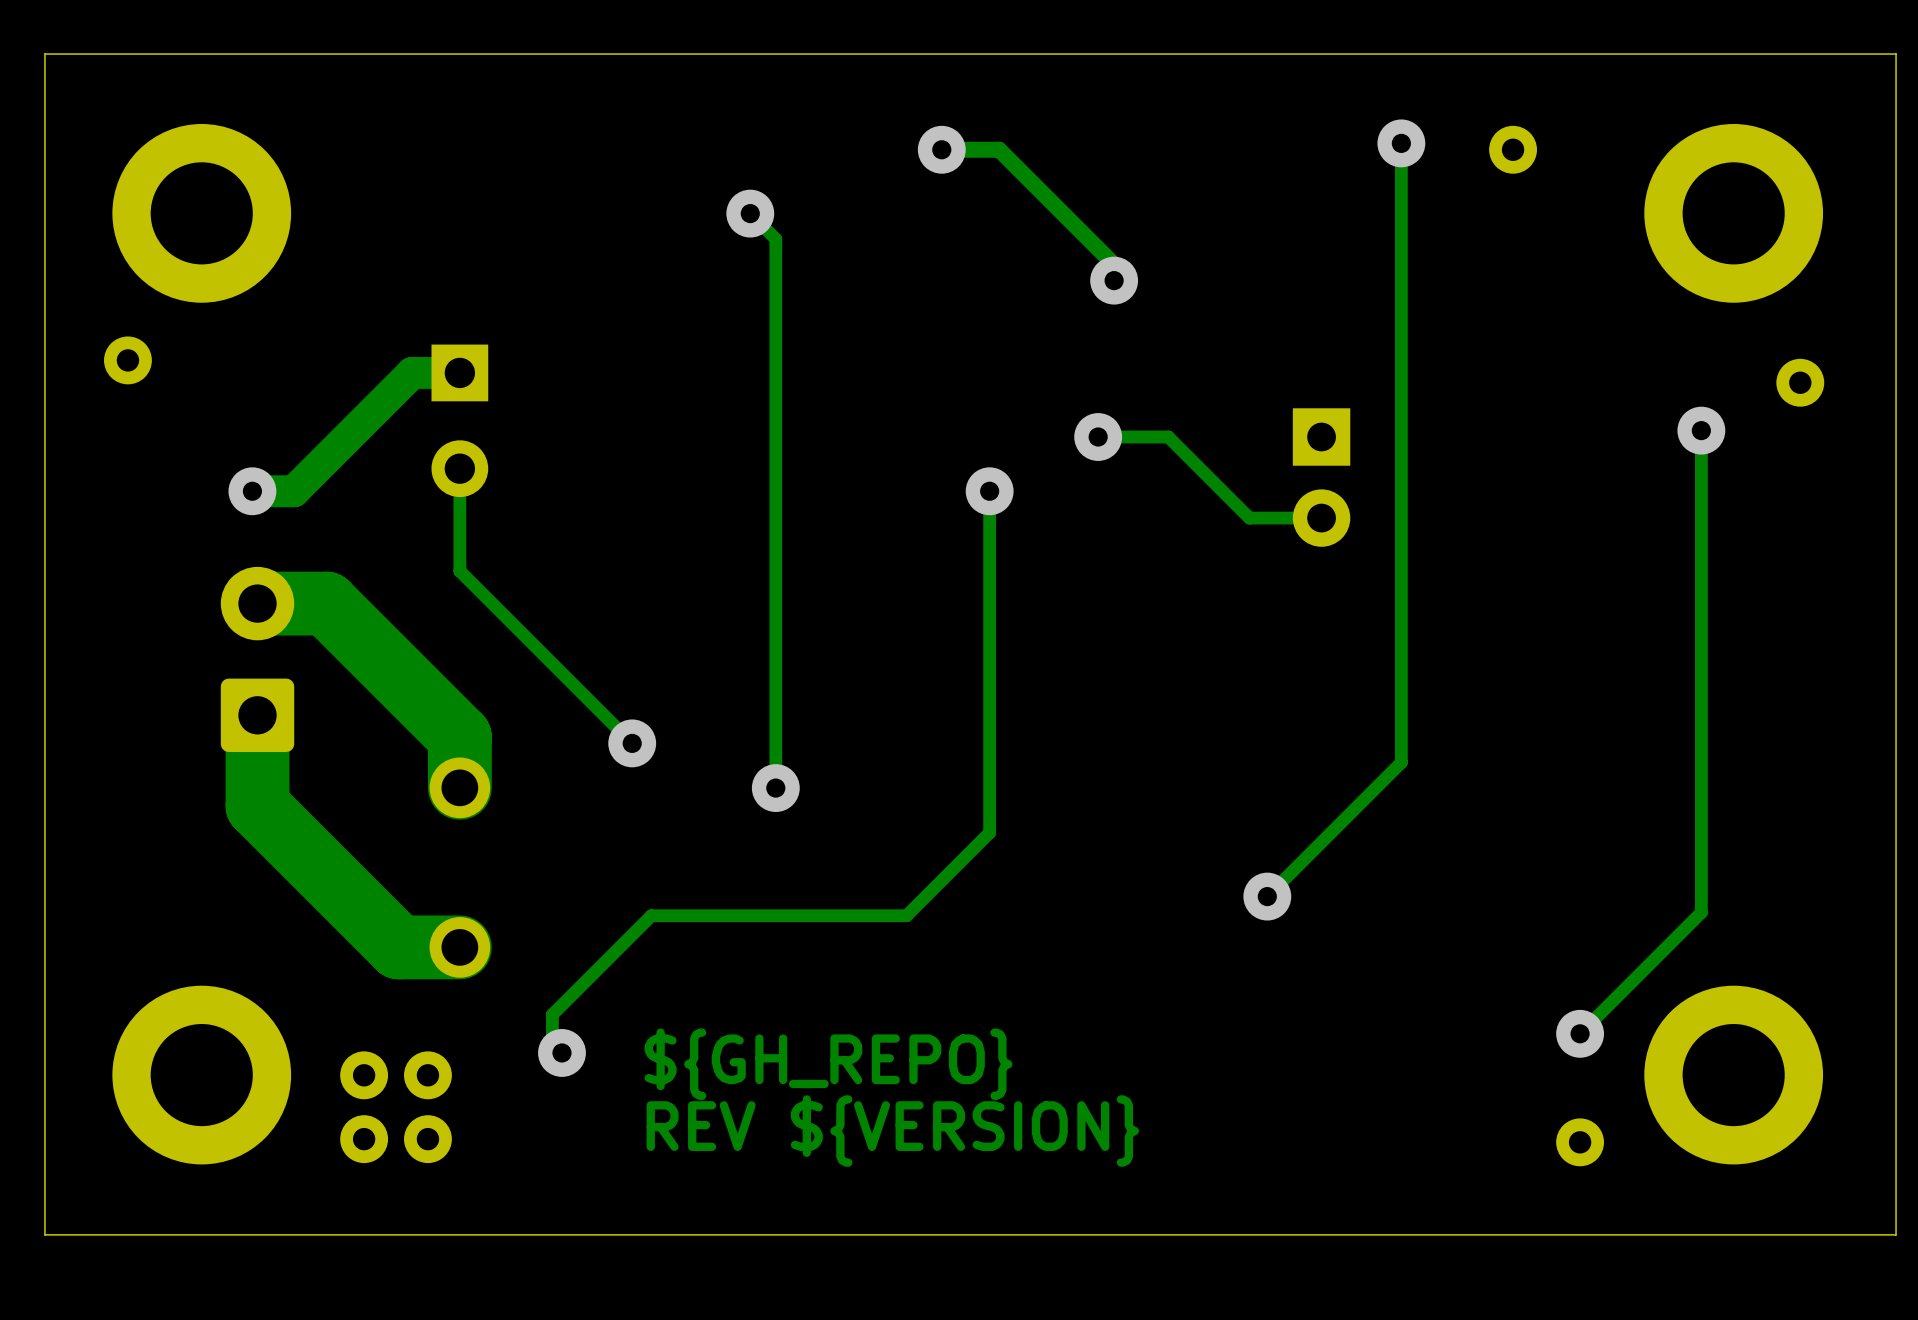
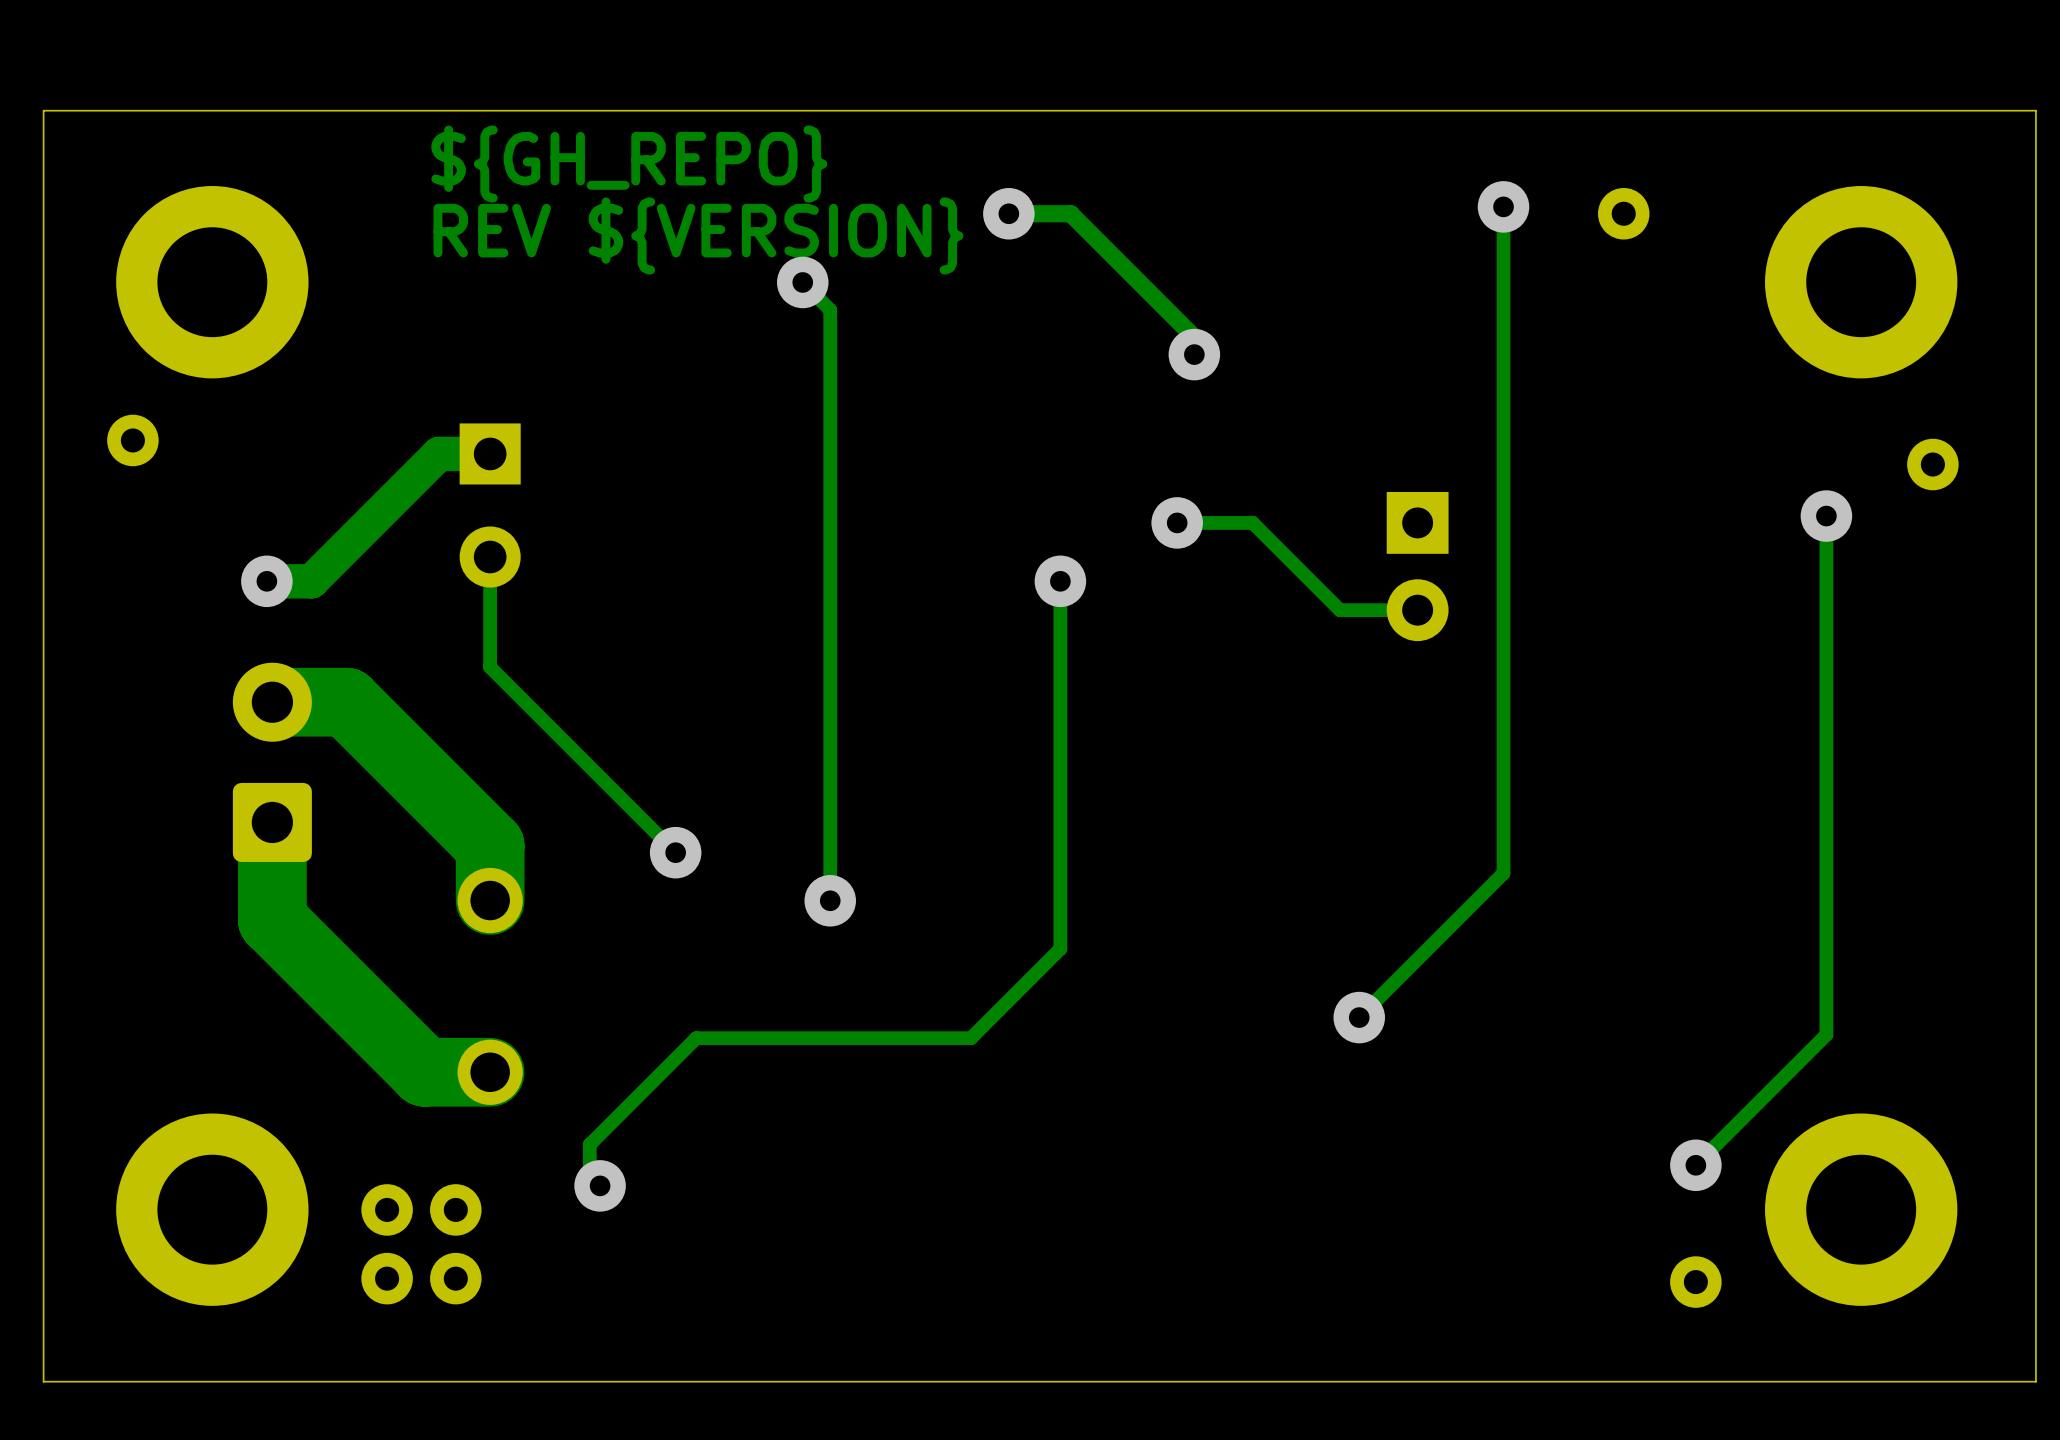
text: none -> ${GH_REPO} (629, 164)
text: none -> REV ${VERSION} (698, 235)
text: ${GH_REPO} (828, 1064) -> none
text: REV ${VERSION} (892, 1131) -> none

